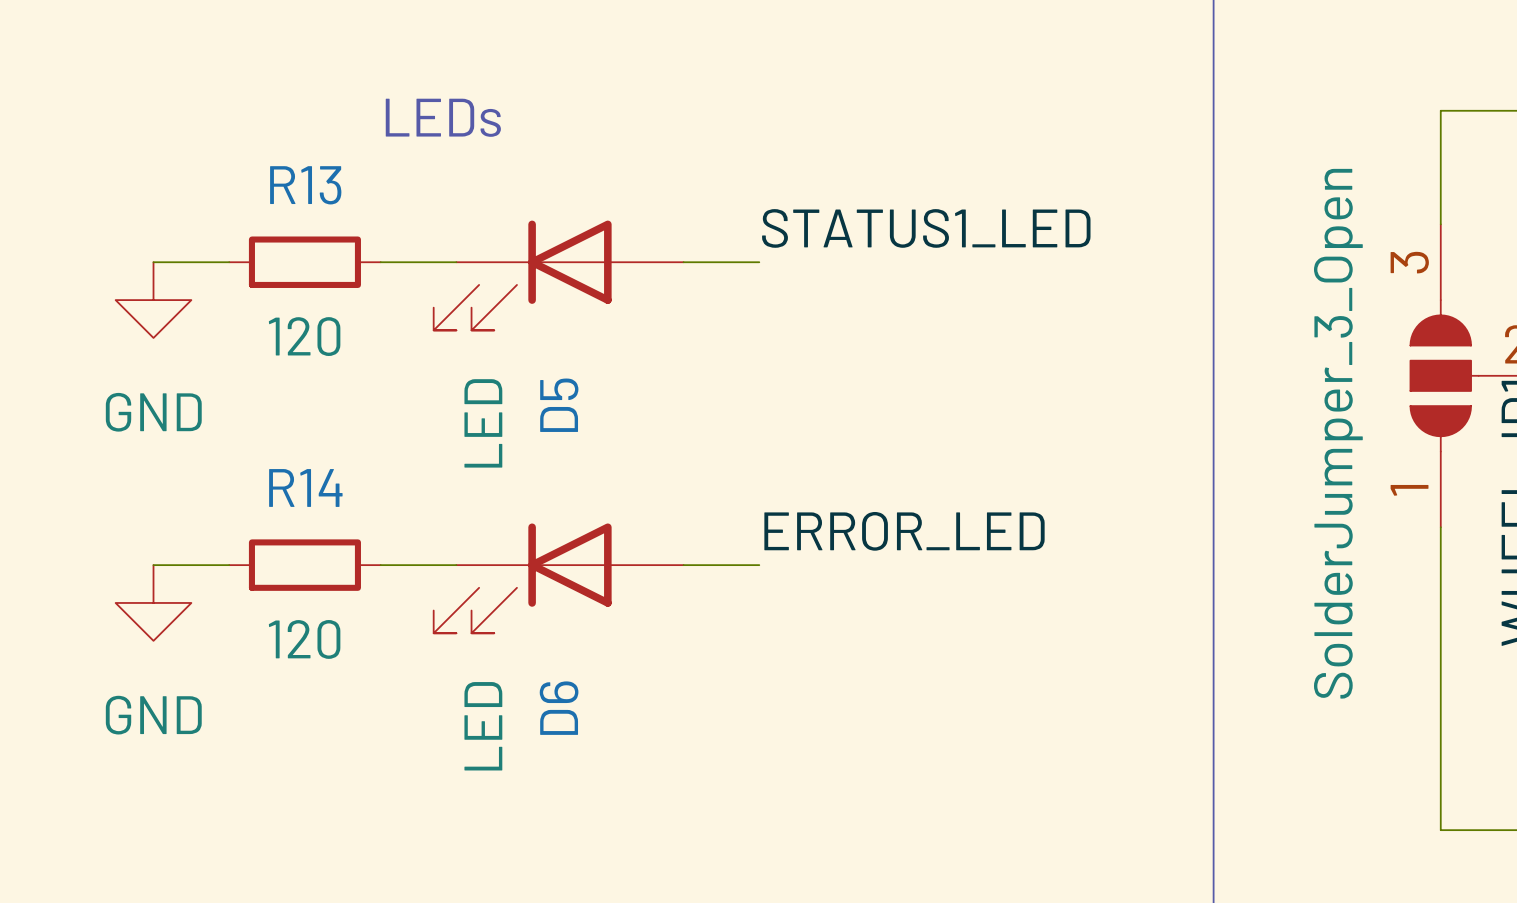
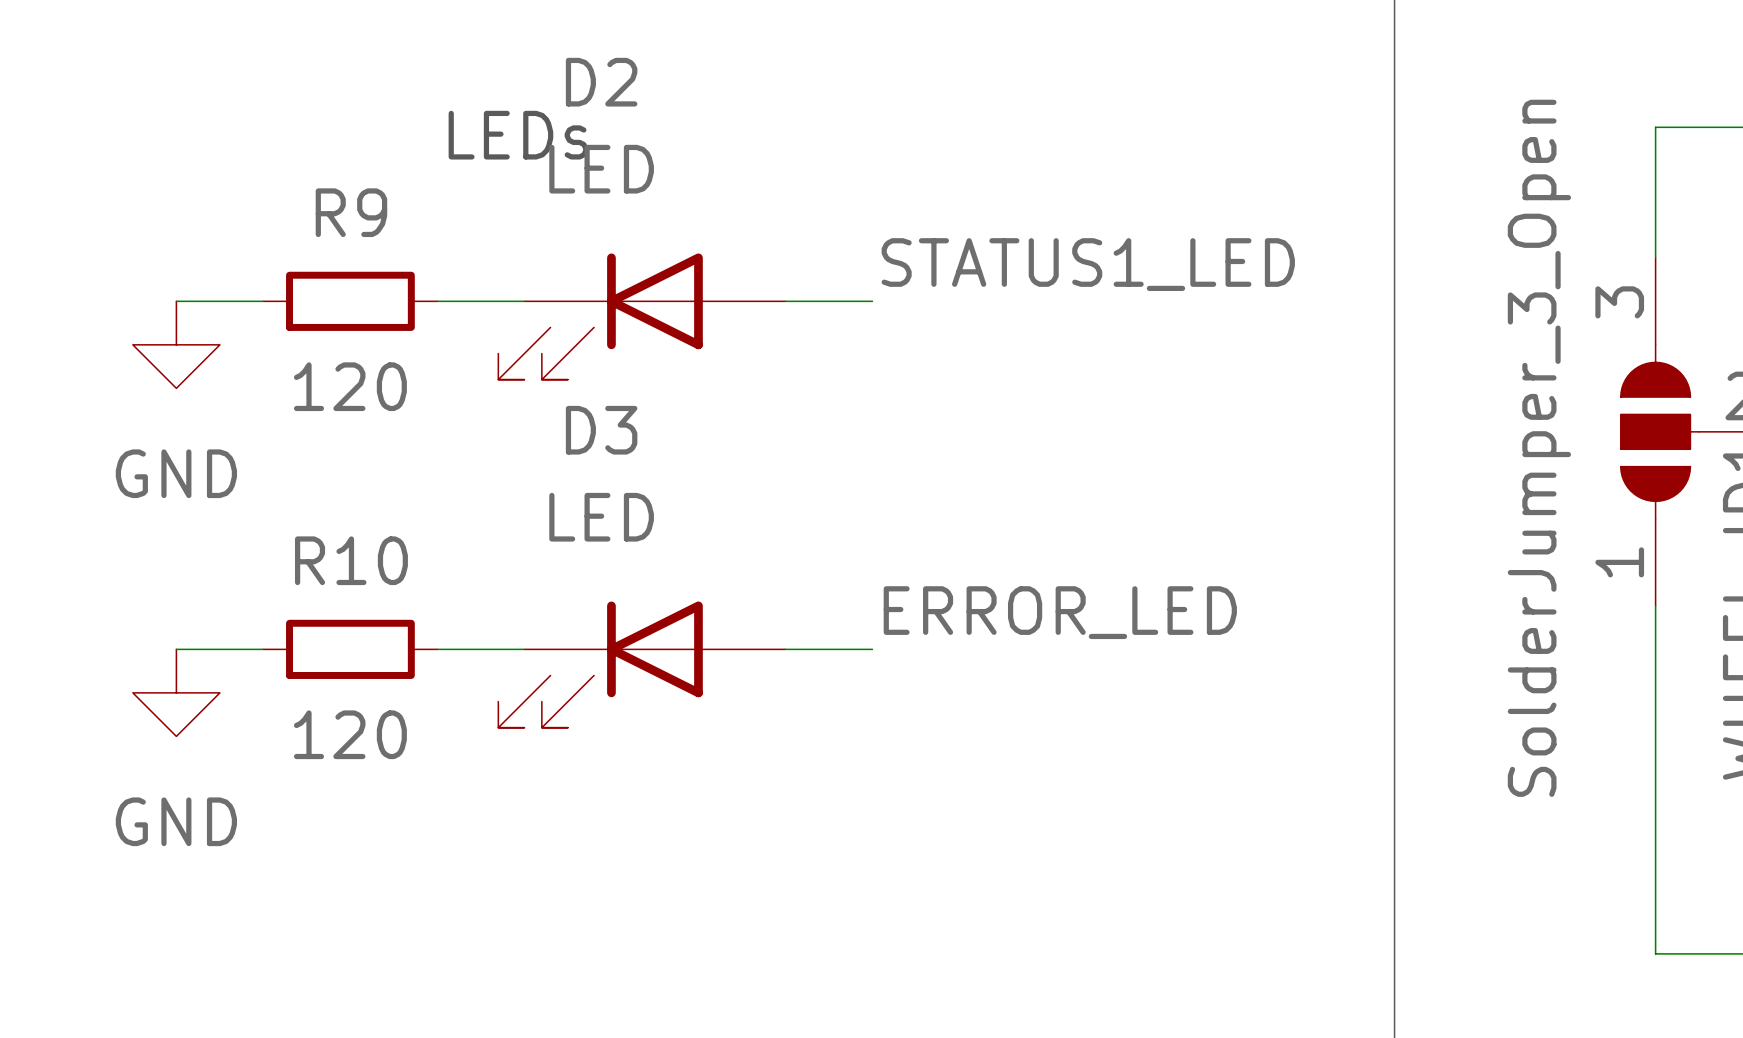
R13 name: R13 (305, 185) -> R9 (351, 212)
D5 name: D5 (559, 405) -> D2 (601, 82)
D5 value rotation: 0° (483, 423) -> 90° clockwise (601, 169)
D5 value position: LED (483, 423) -> LED (601, 169)
R14 name: R14 (305, 487) -> R10 (351, 560)
D6 name: D6 (559, 708) -> D3 (601, 430)
D6 value rotation: 0° (483, 726) -> 90° clockwise (601, 517)
D6 value position: LED (483, 726) -> LED (601, 517)

